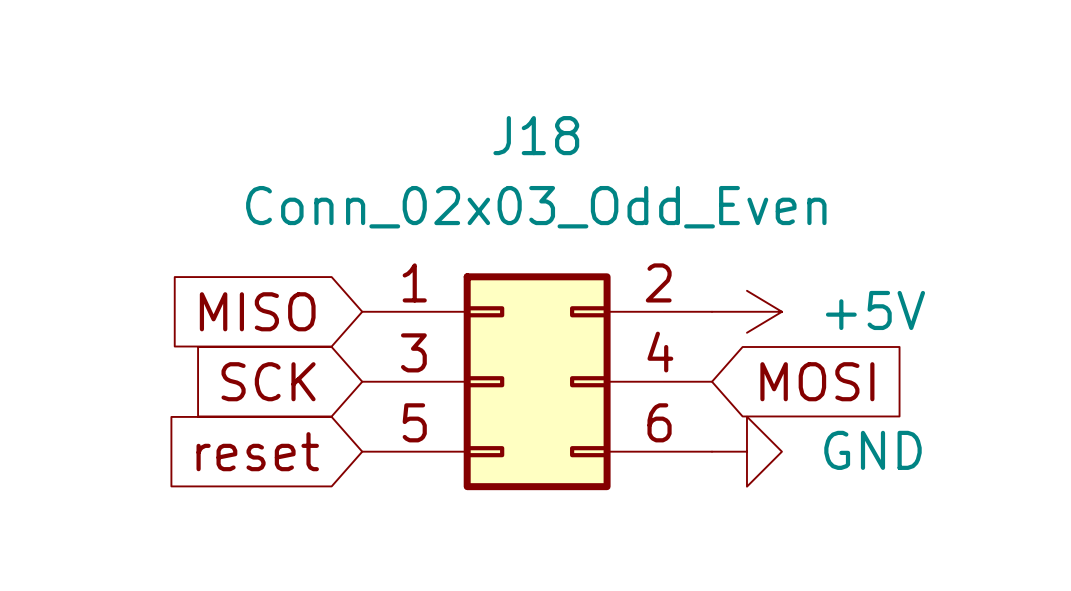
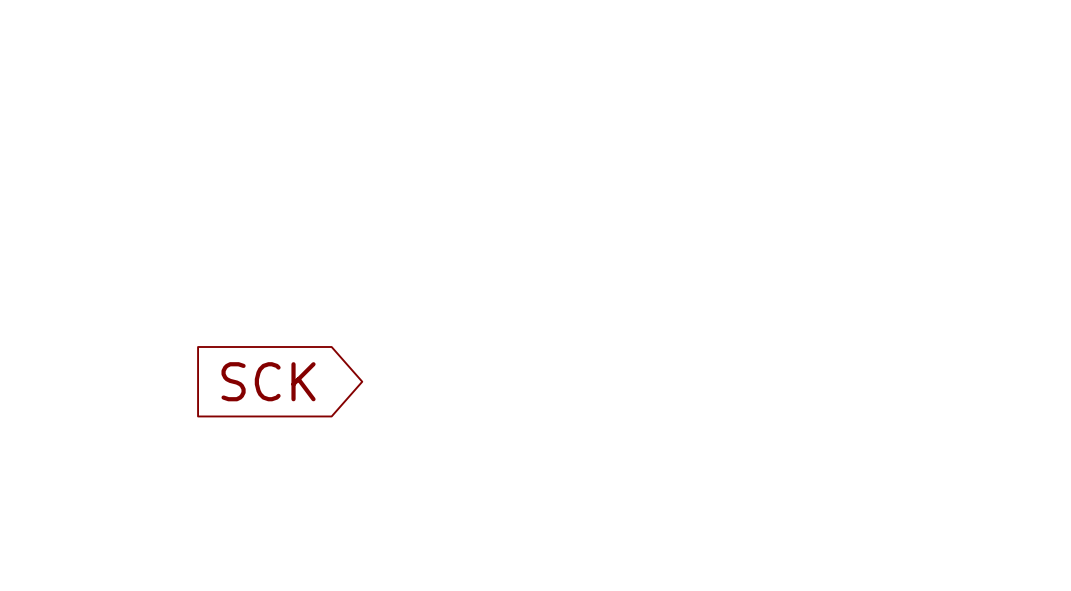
global label: MISO (257, 311) -> none
power symbol: +5V (746, 311) -> none
J18: Conn_02x03_Odd_Even (537, 381) -> none
global label: MOSI (817, 381) -> none
global label: reset (257, 451) -> none
power symbol: GND (746, 451) -> none

